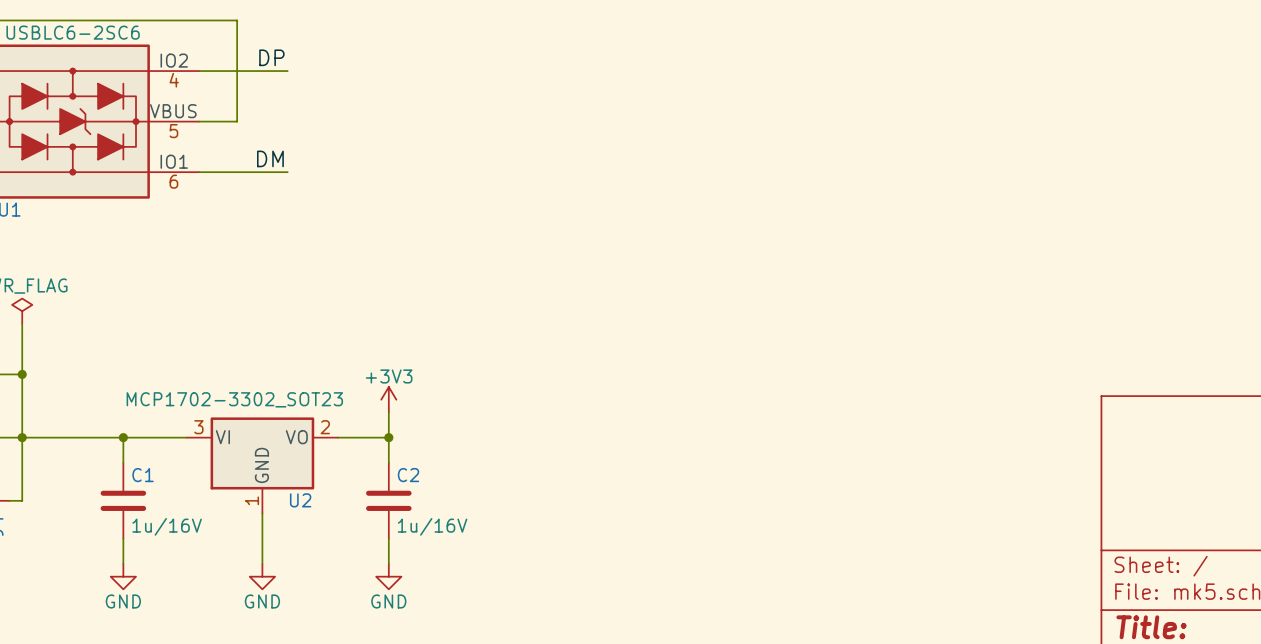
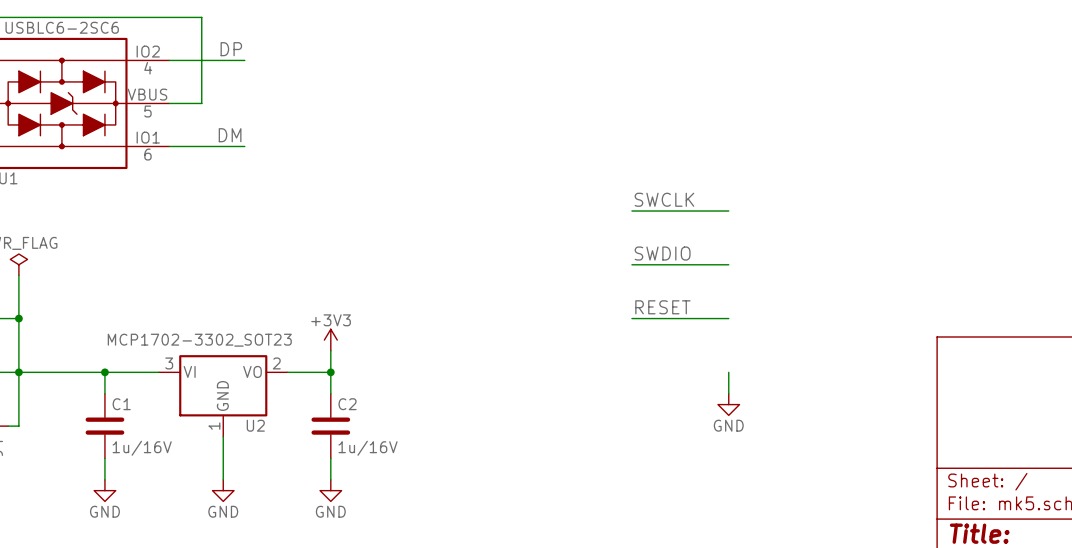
label: none -> SWCLK (664, 199)
wire: none -> (631, 211) (728, 211)
label: none -> SWDIO (662, 253)
wire: none -> (631, 264) (728, 264)
label: none -> RESET (662, 307)
wire: none -> (631, 318) (728, 318)
wire: none -> (728, 372) (728, 393)
power symbol: none -> GND (728, 404)

